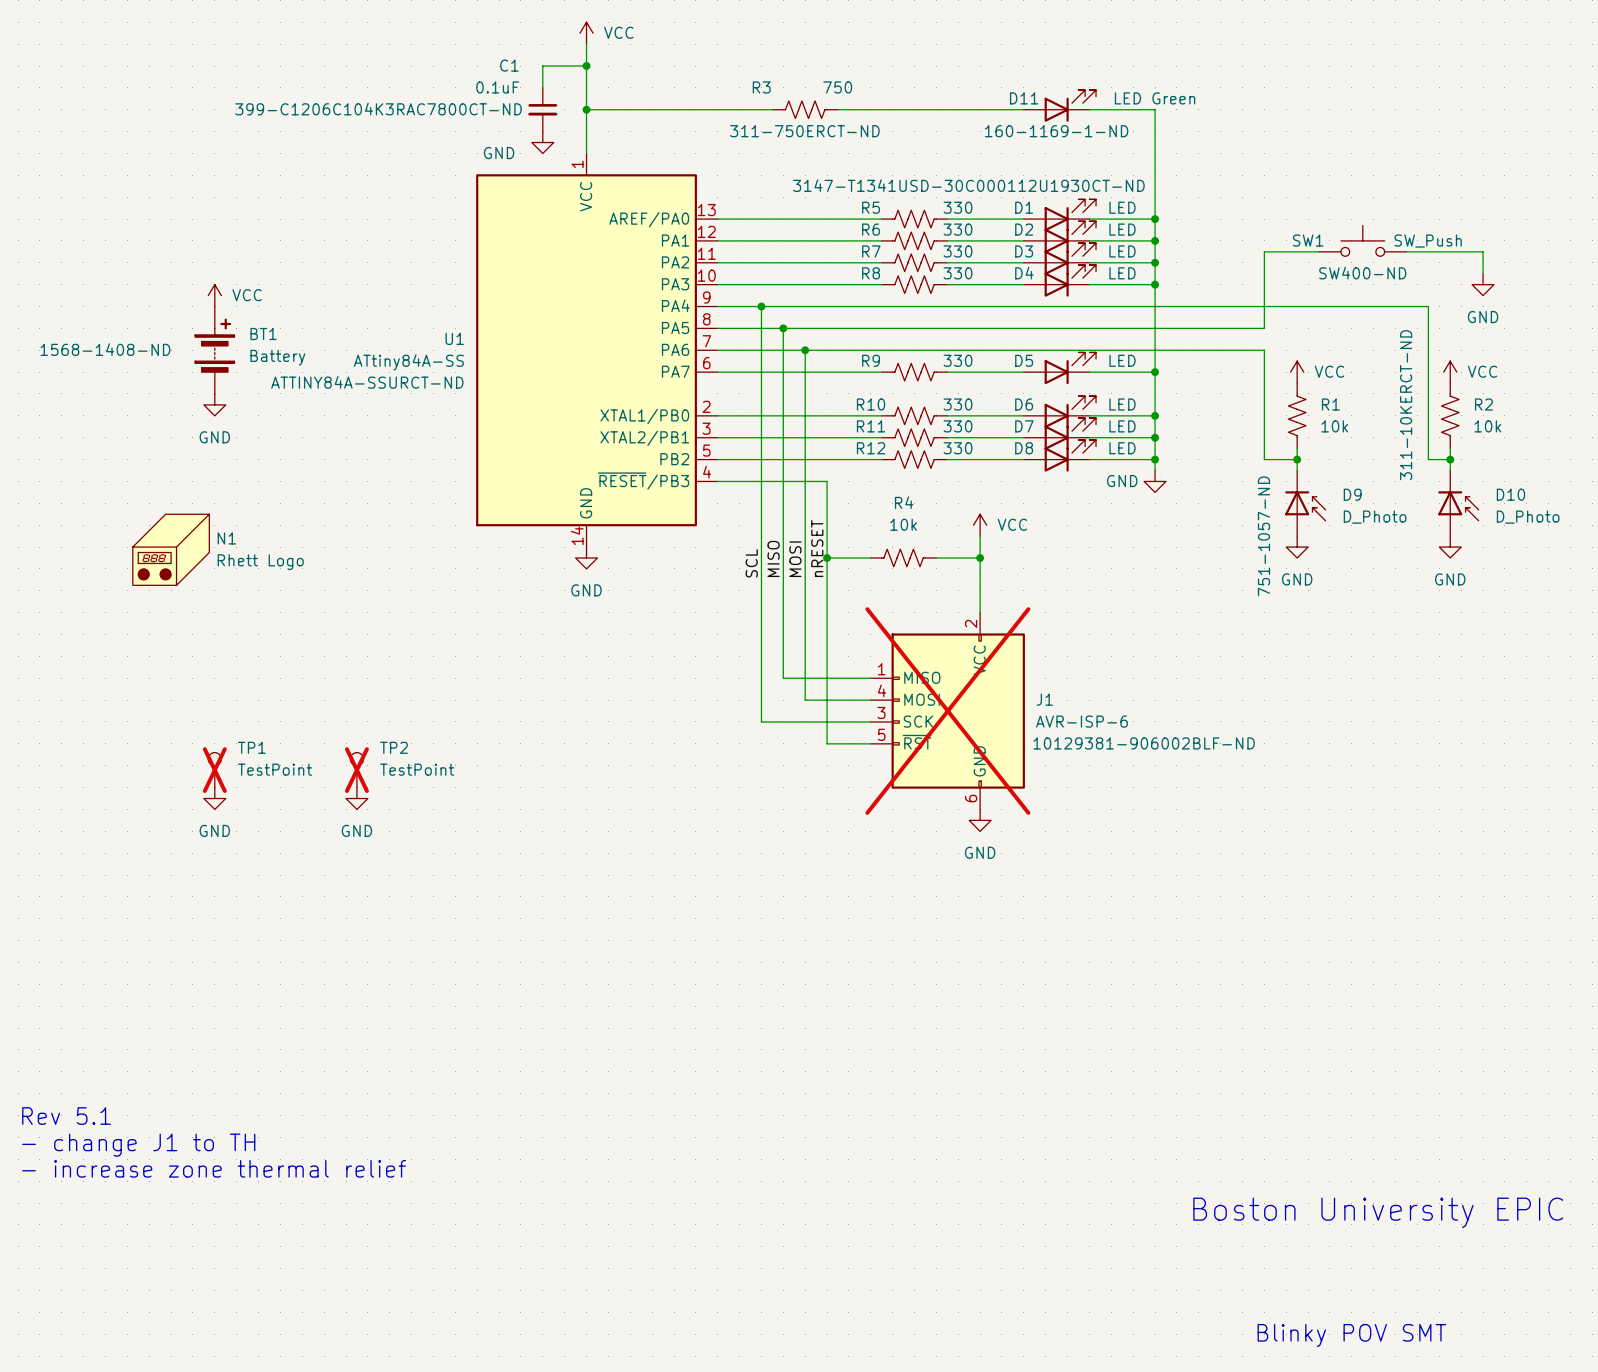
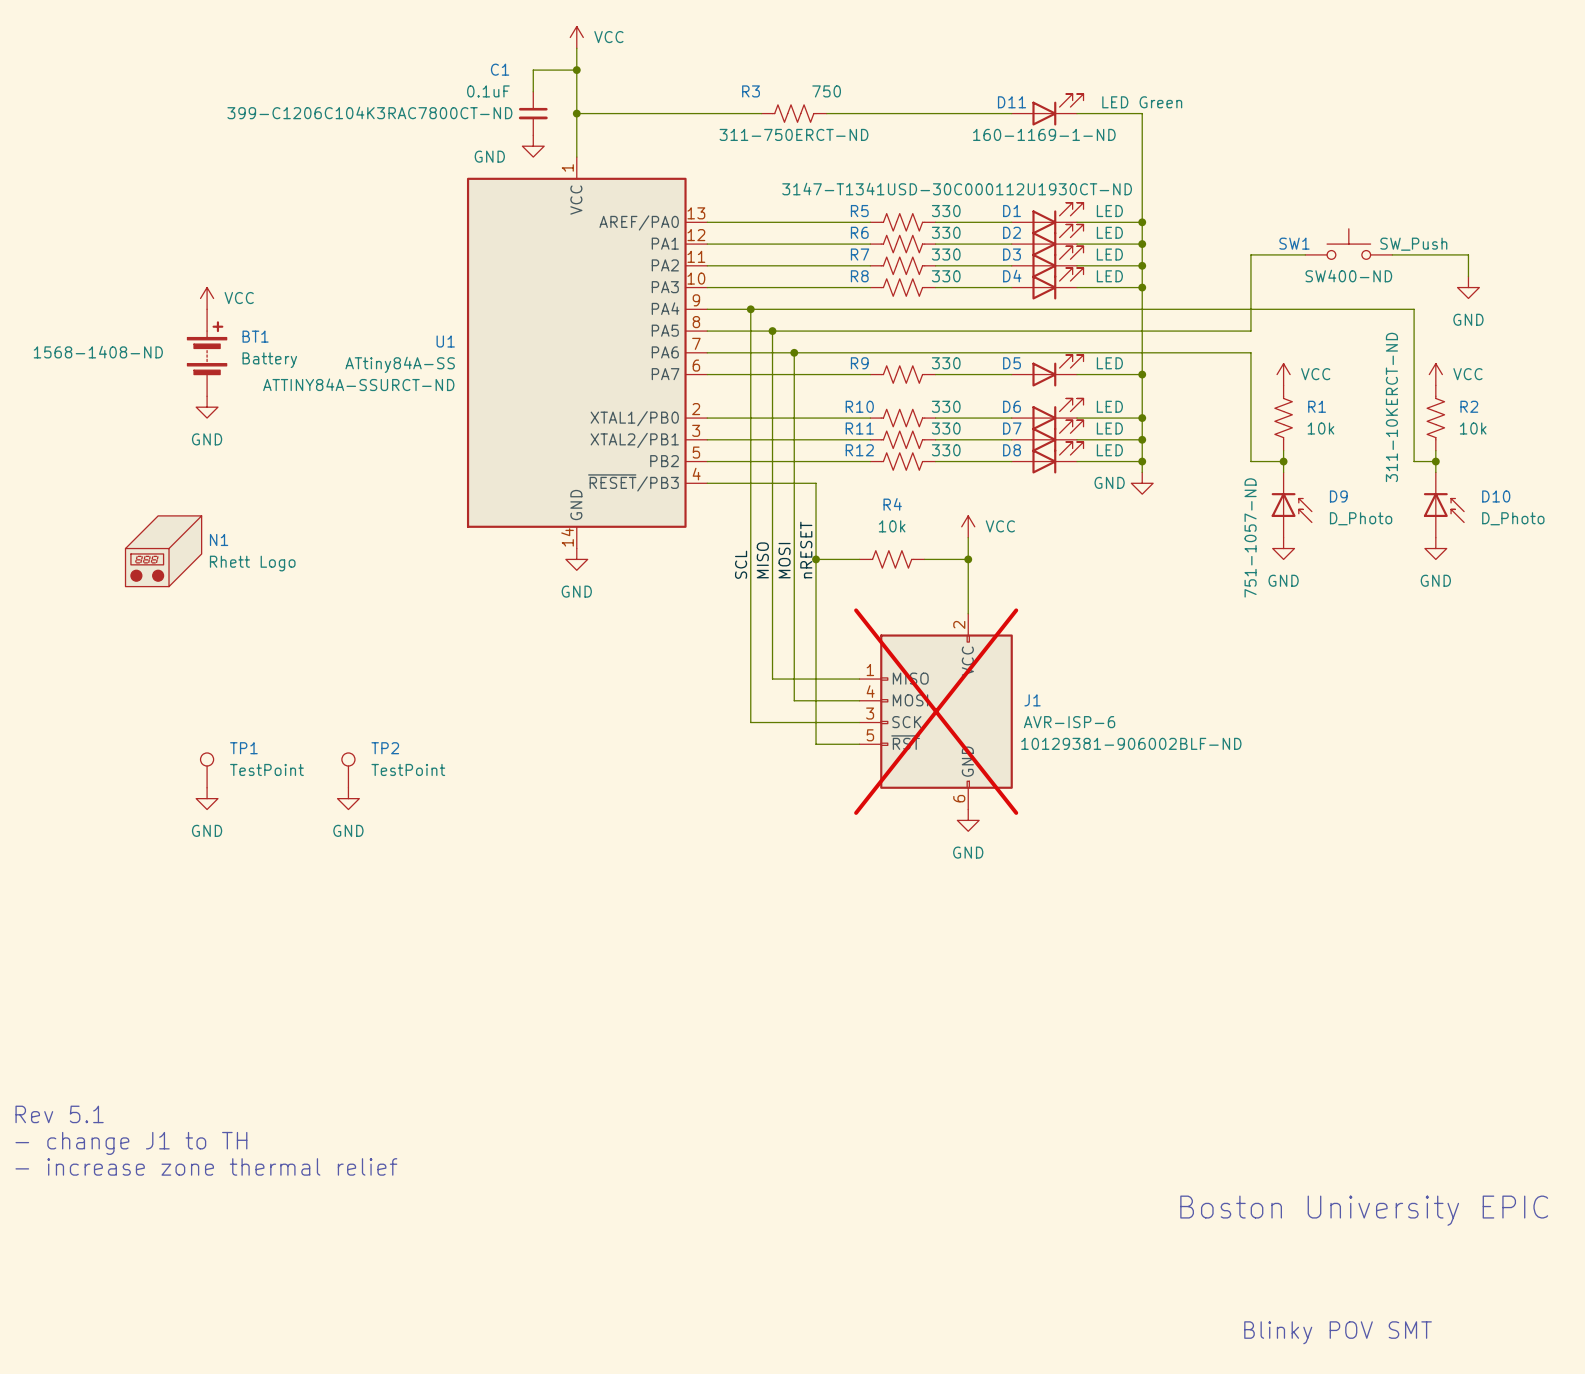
TP1 do-not-place cross: (214, 770) -> none
TP2 do-not-place cross: (356, 770) -> none

